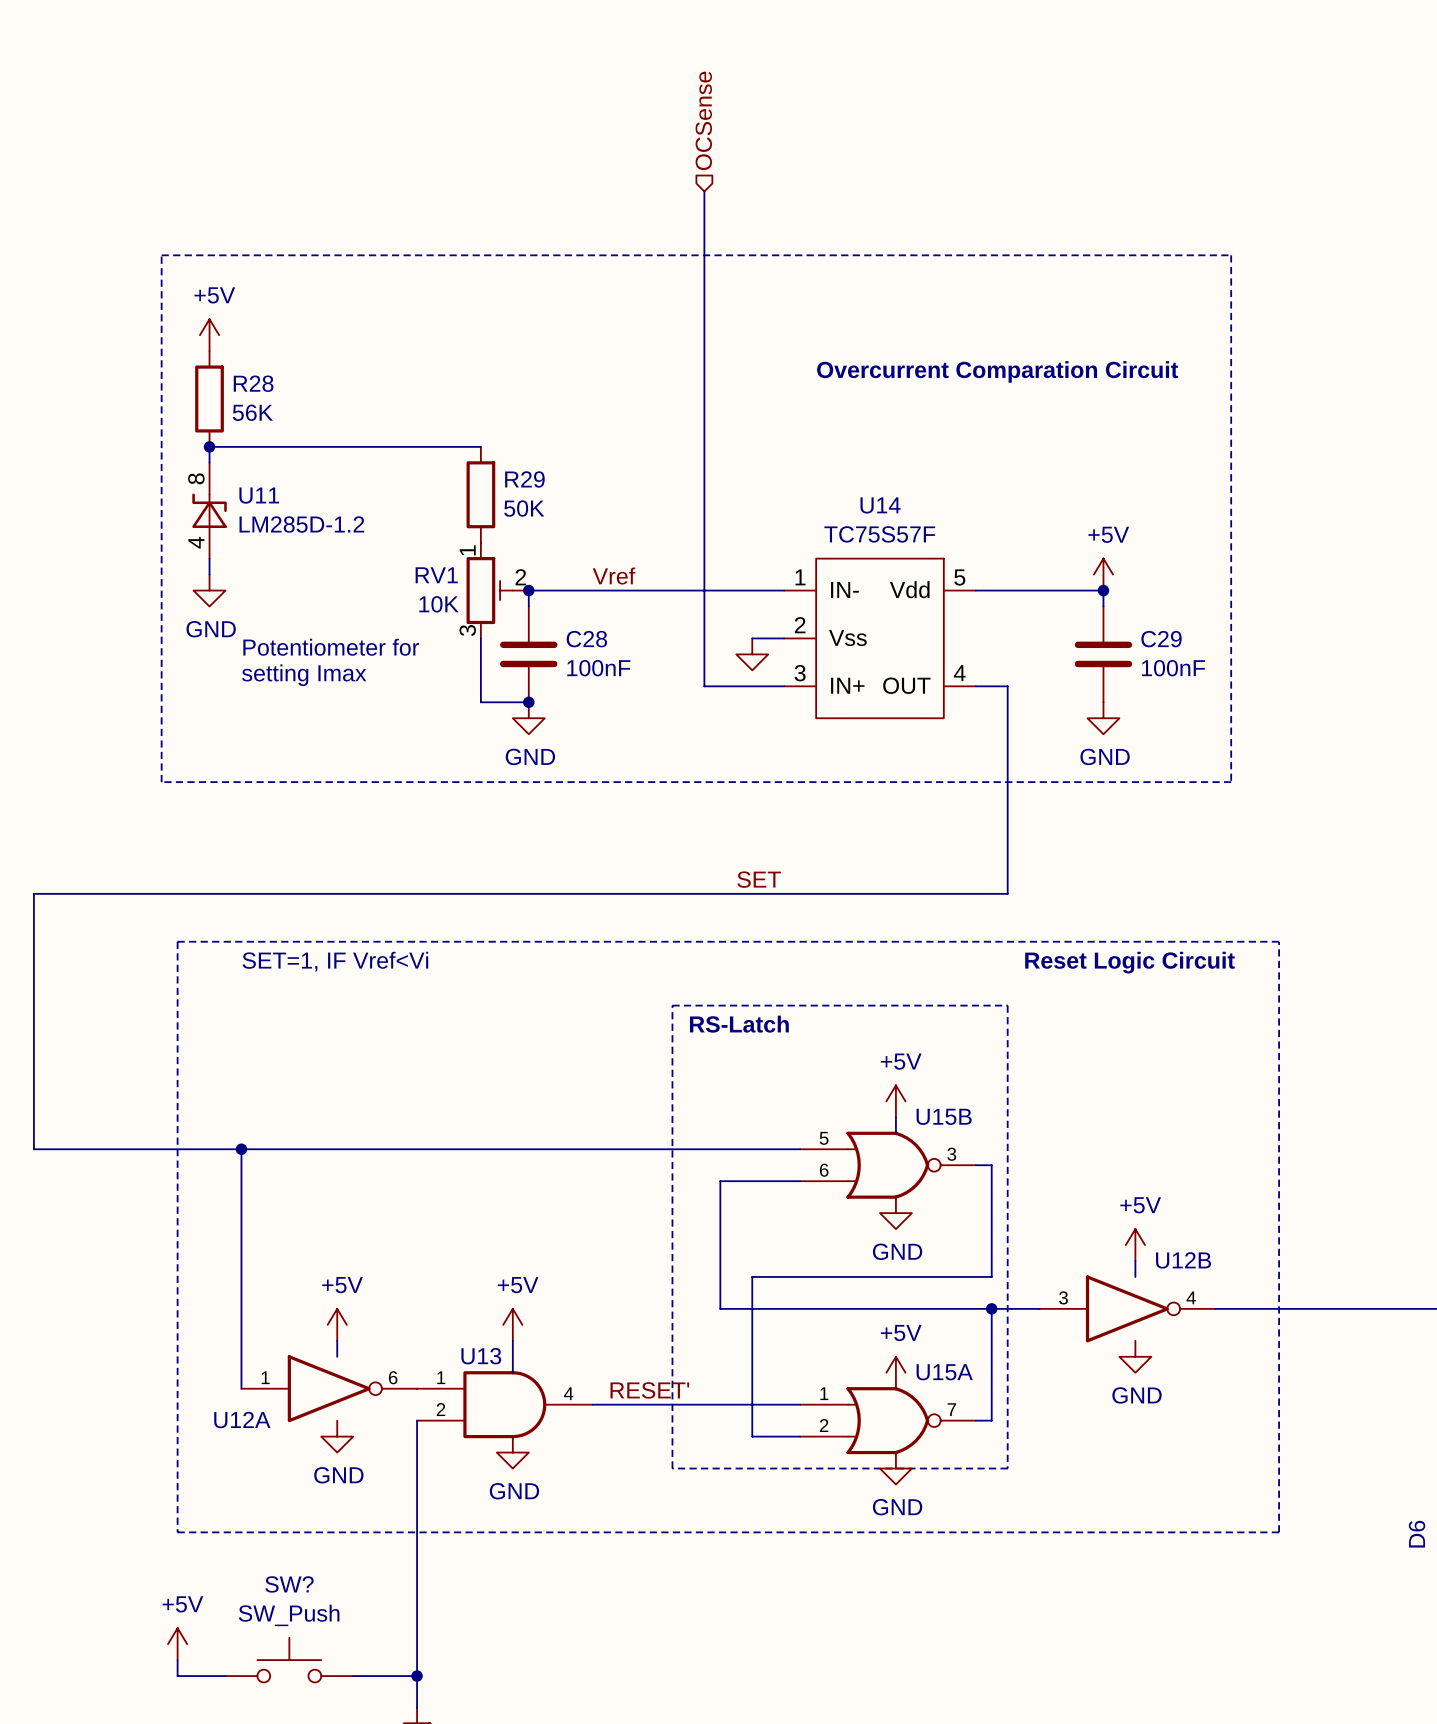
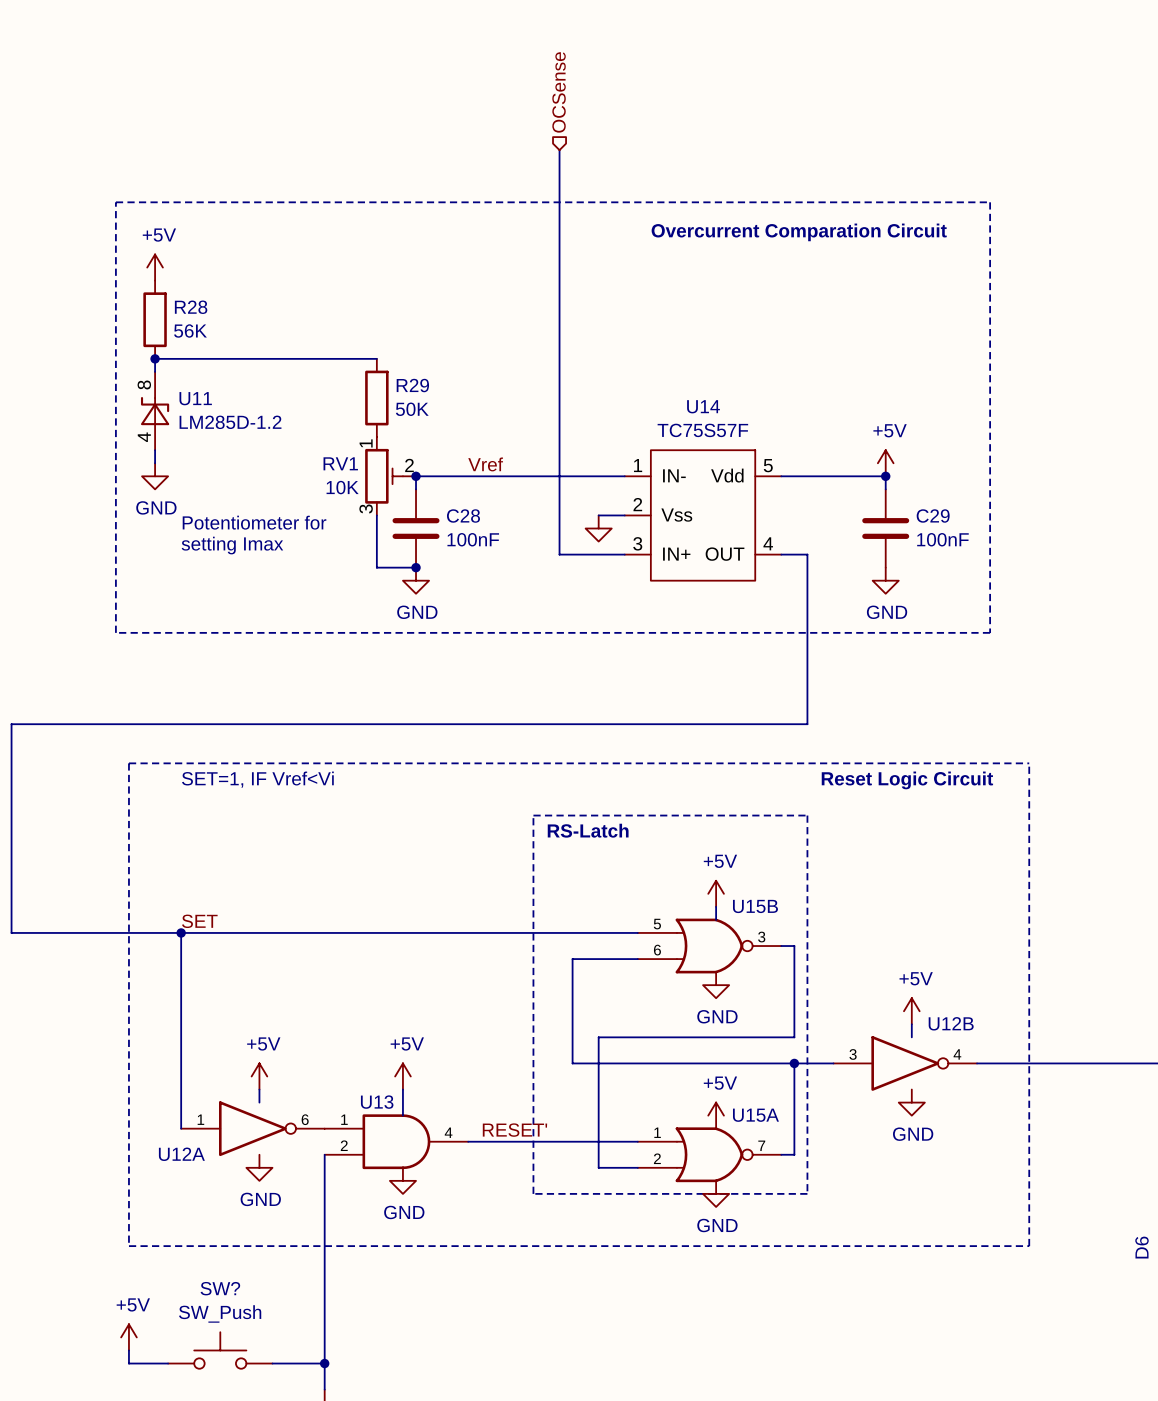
text position: Overcurrent Comparation Circuit (997, 371) -> Overcurrent Comparation Circuit (799, 232)
label: SET (759, 879) -> none
label: none -> SET (199, 921)

